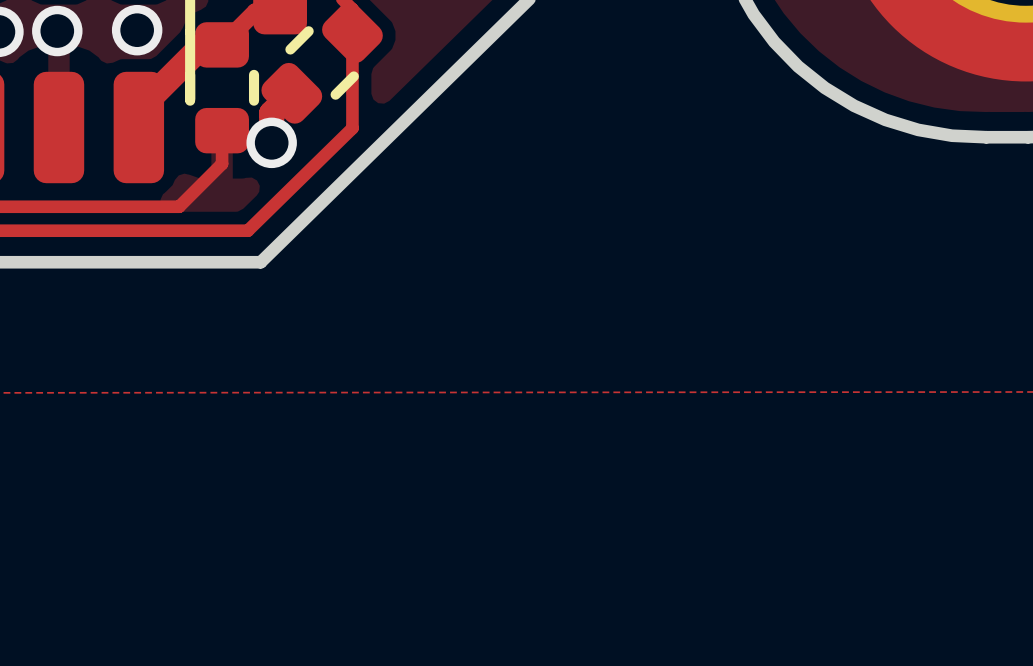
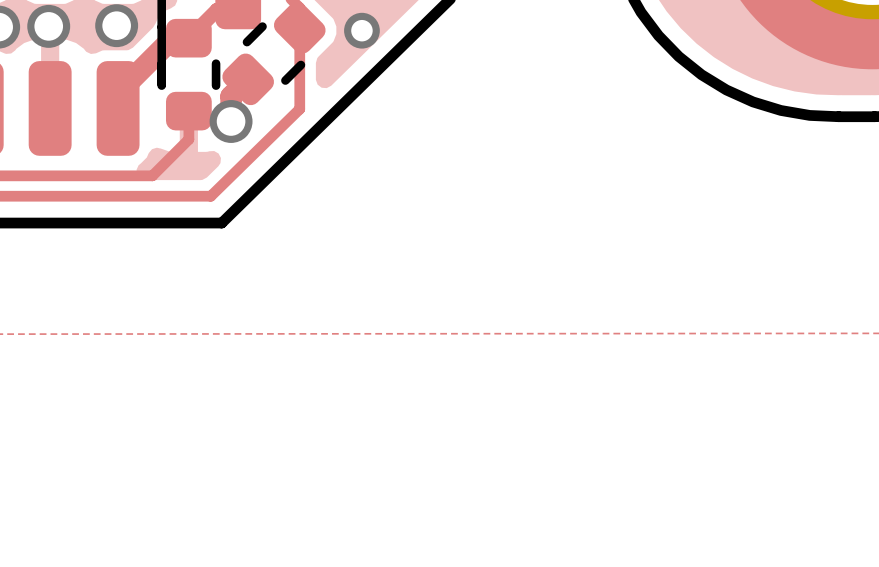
via: none -> (361, 30)

